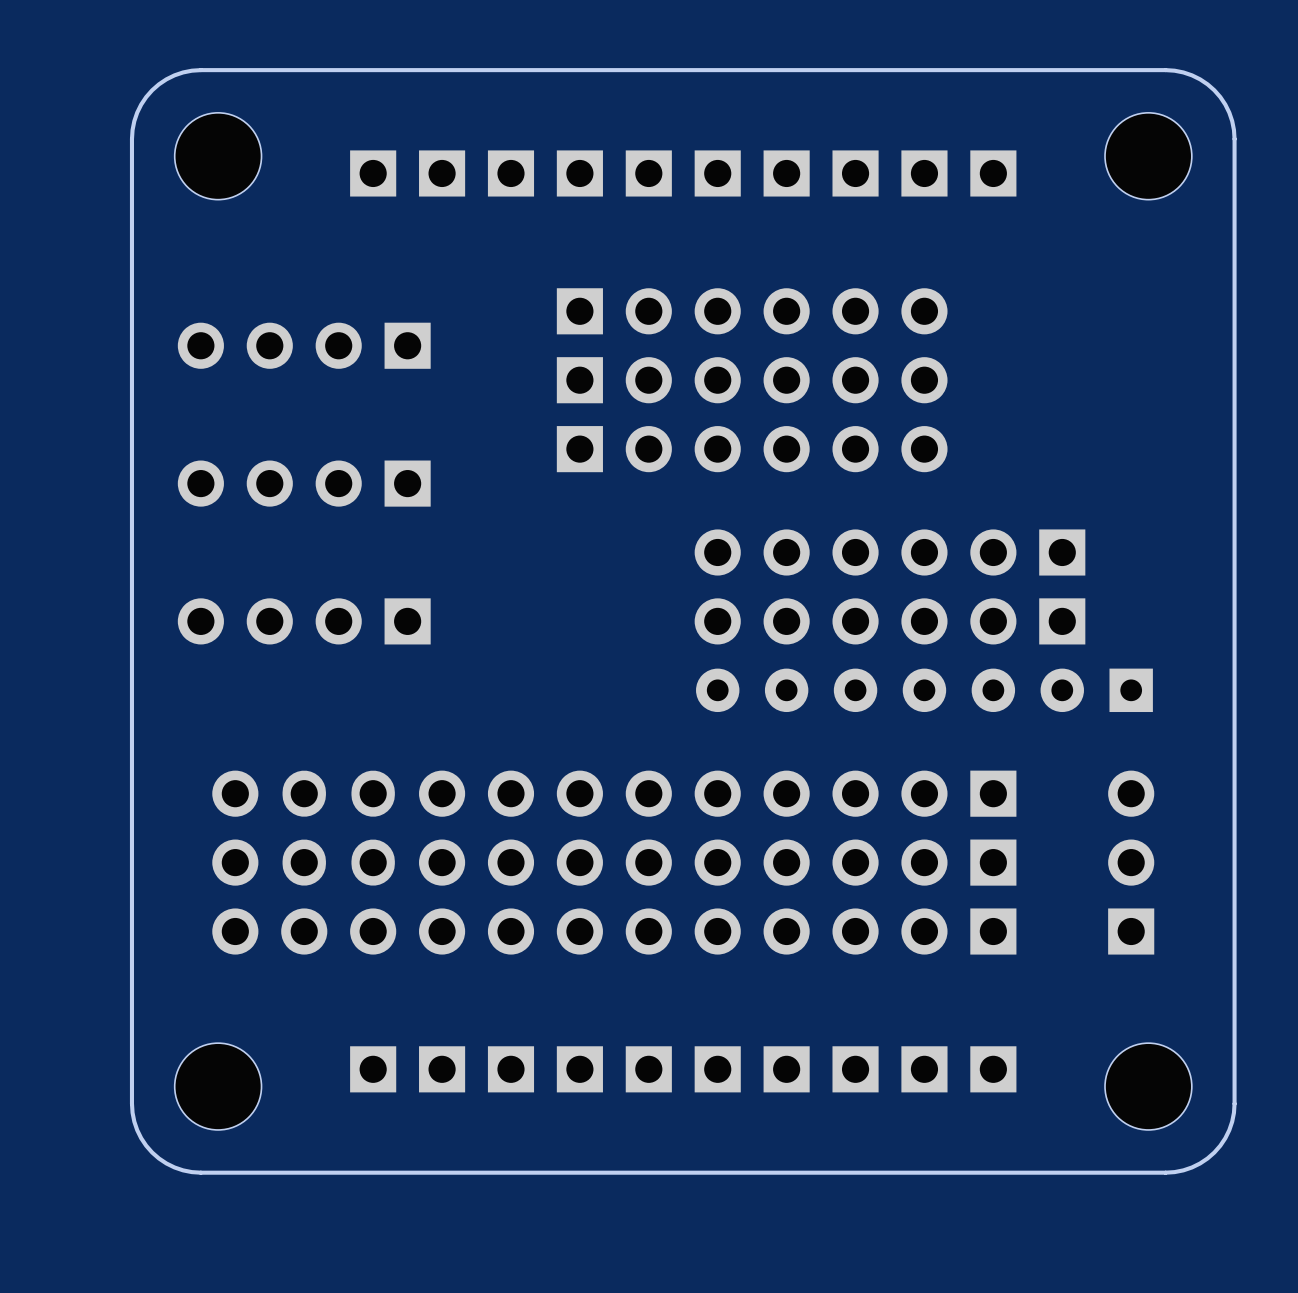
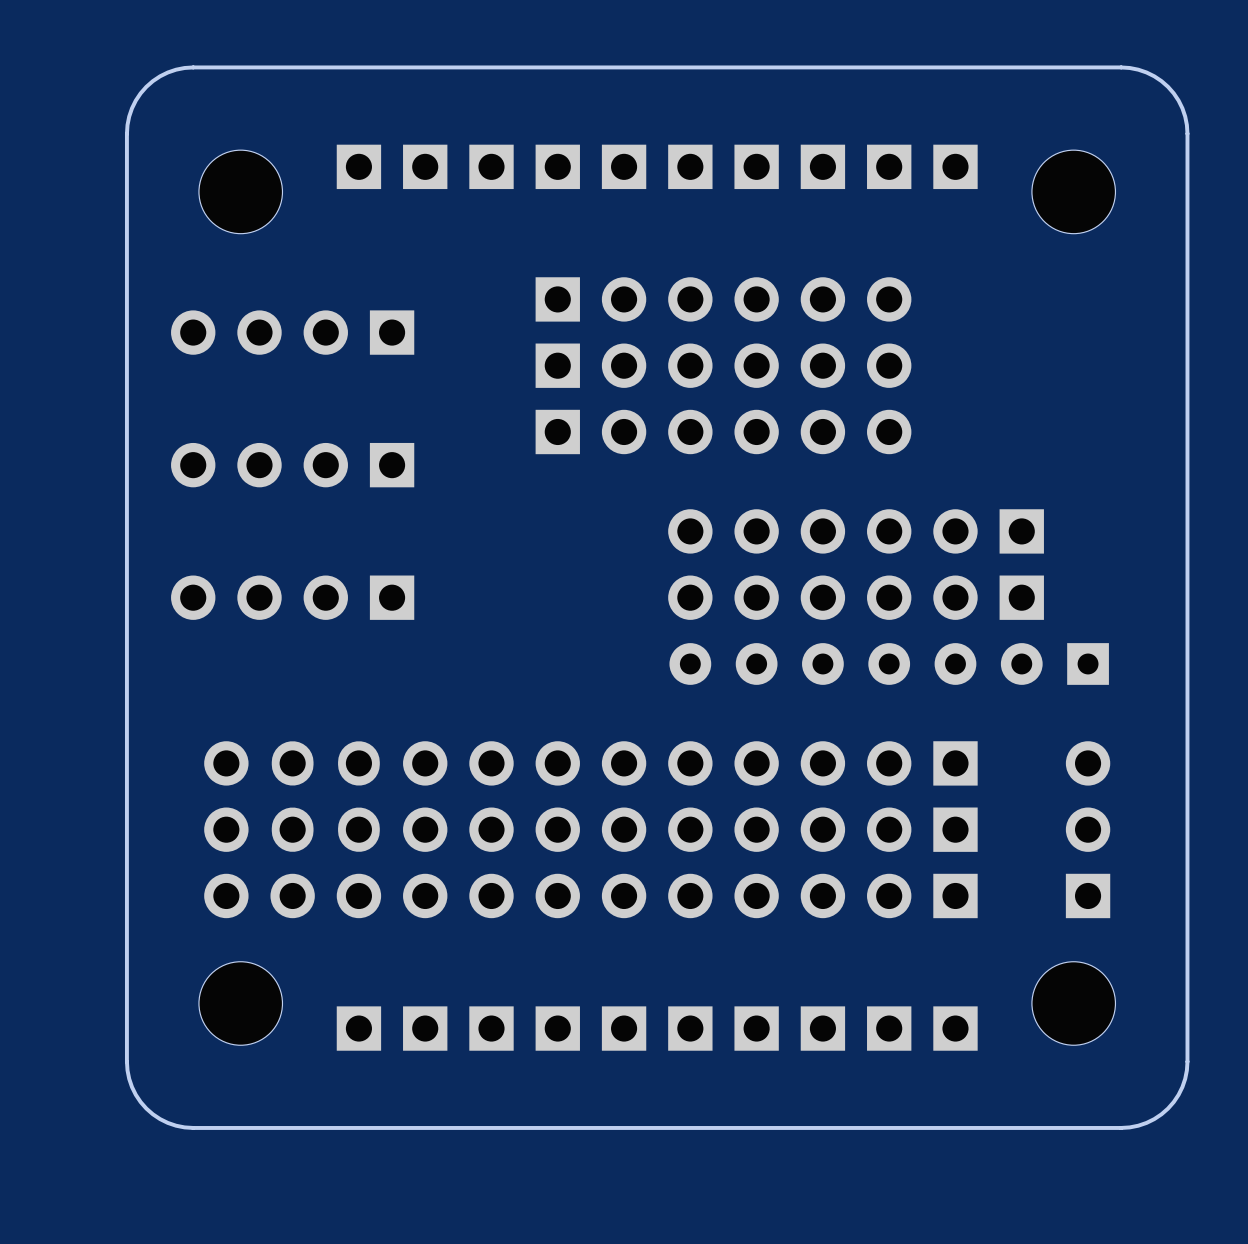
part position: (218, 156) -> (240, 191)
part position: (1148, 156) -> (1073, 191)
part position: (218, 1086) -> (240, 1003)
part position: (1148, 1086) -> (1073, 1003)

